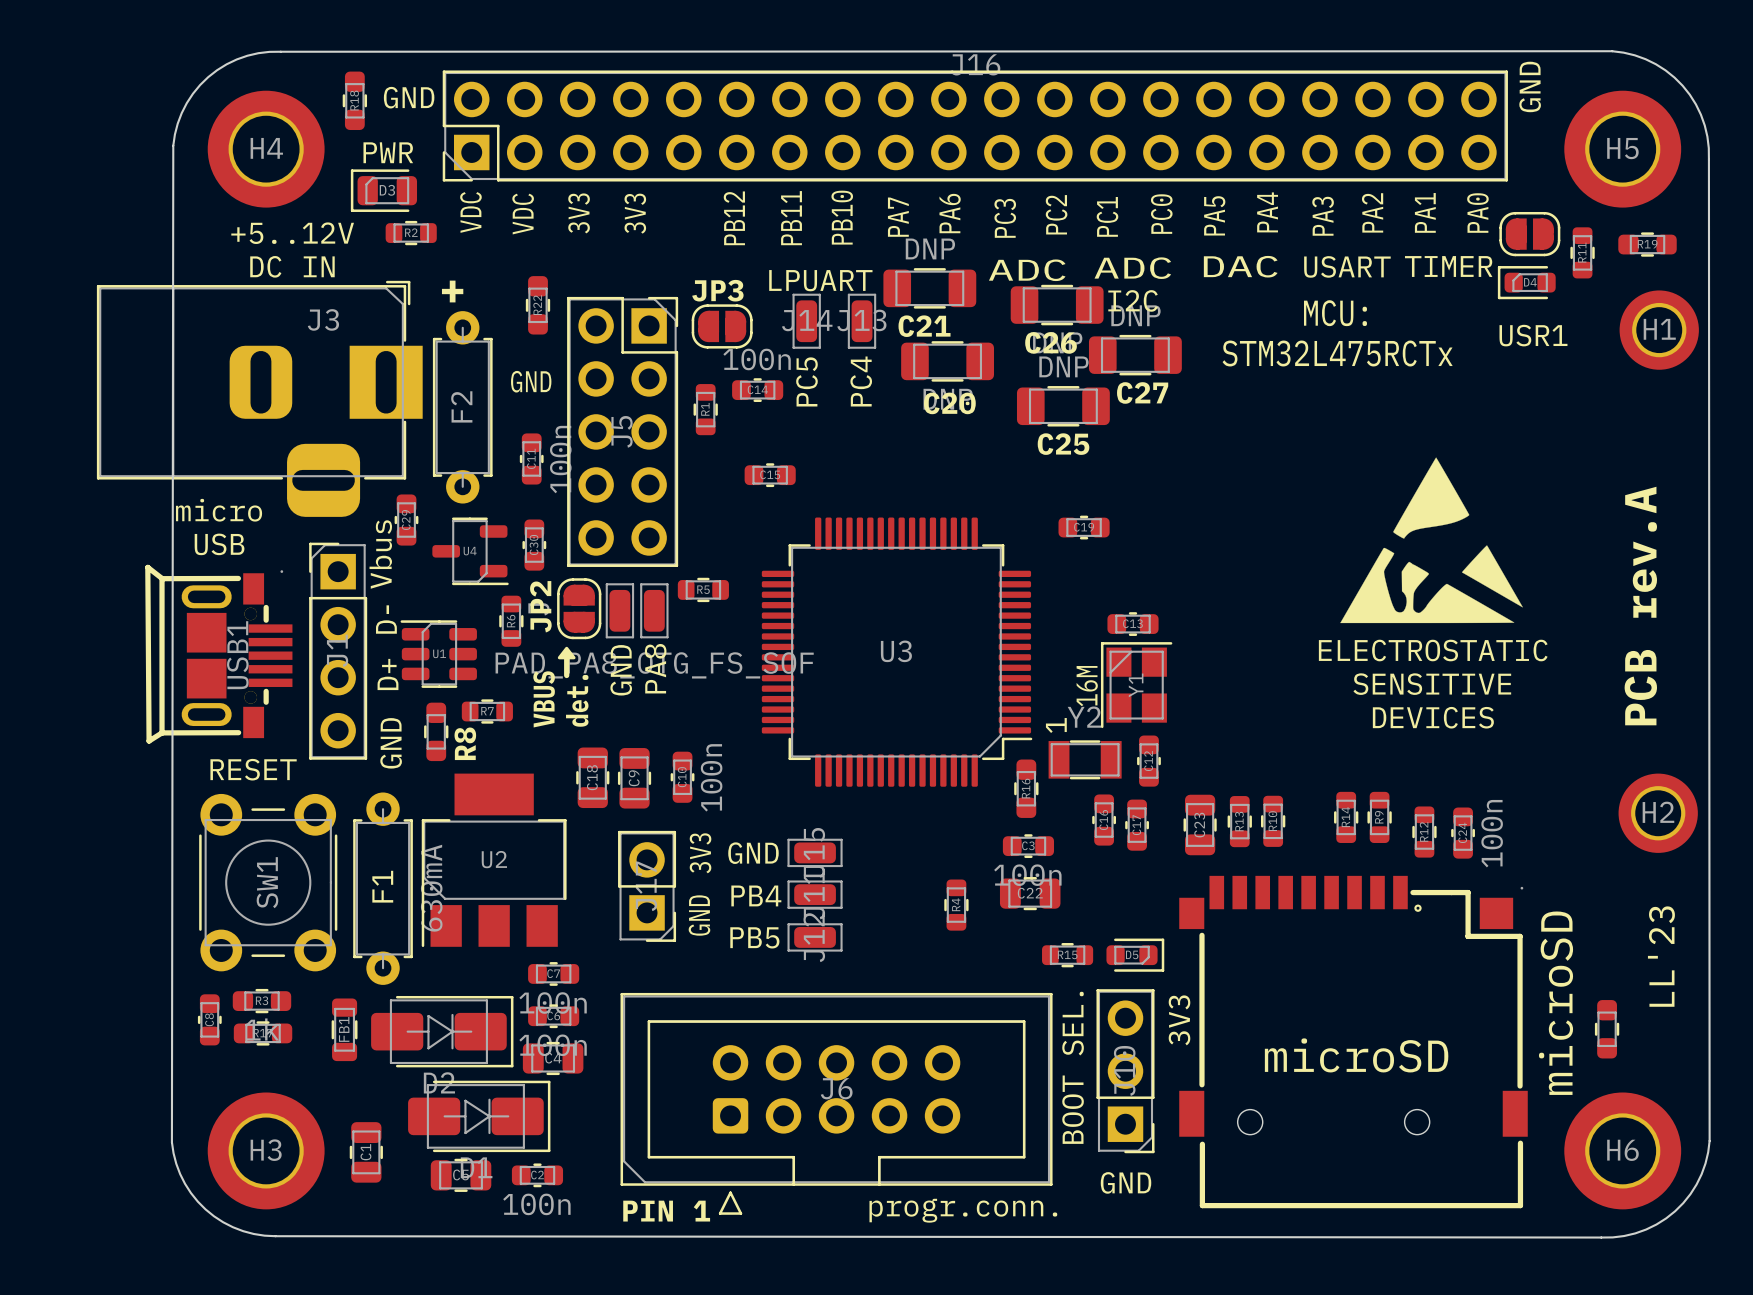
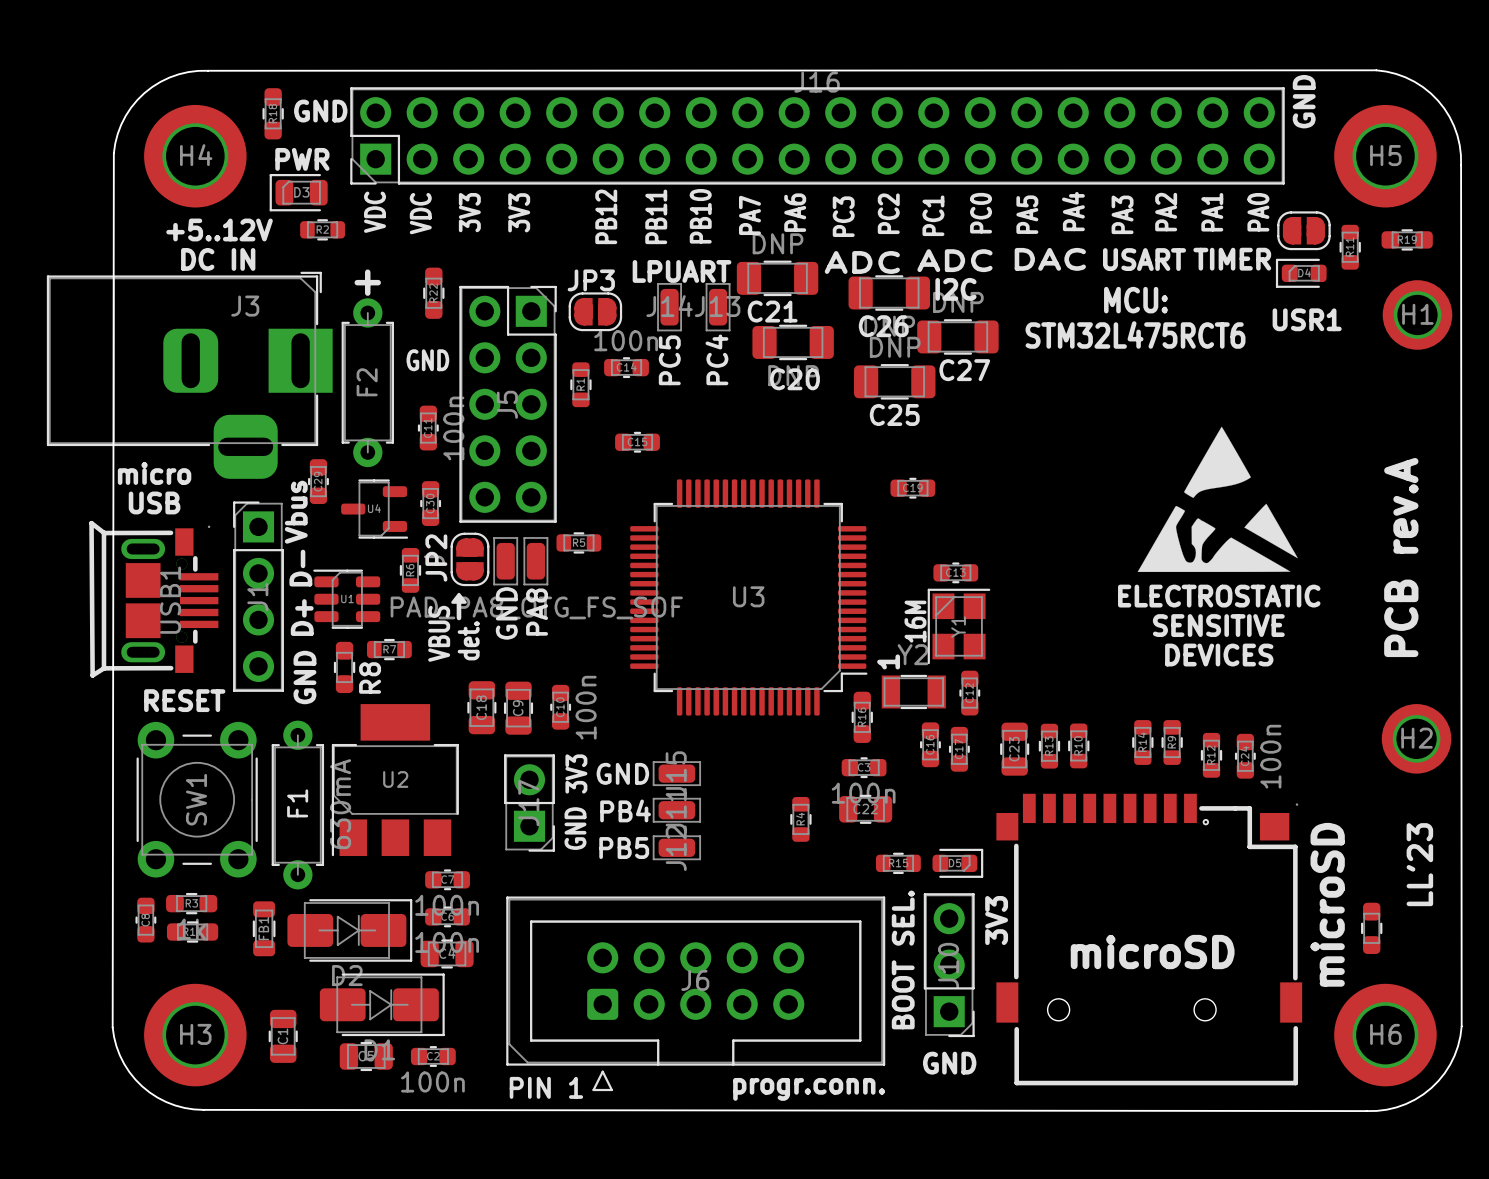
text: STM32L475RCTx (1337, 353) -> STM32L475RCT6 (1135, 334)

